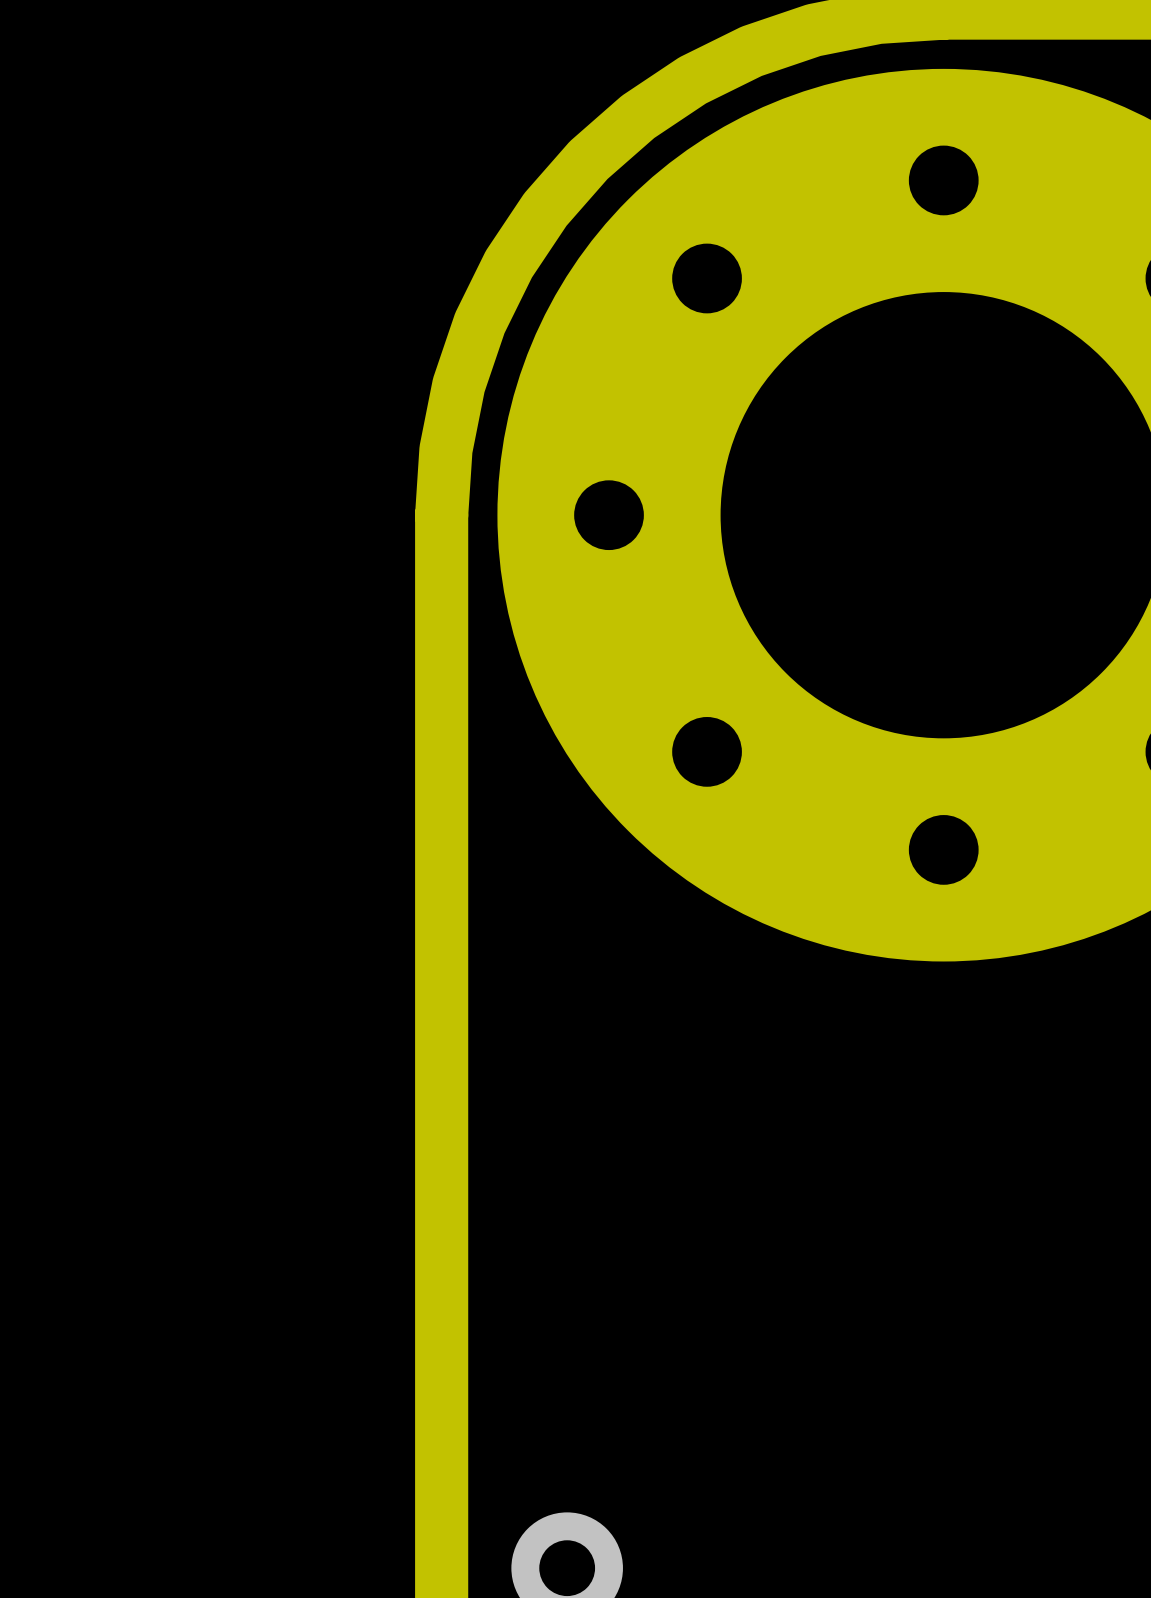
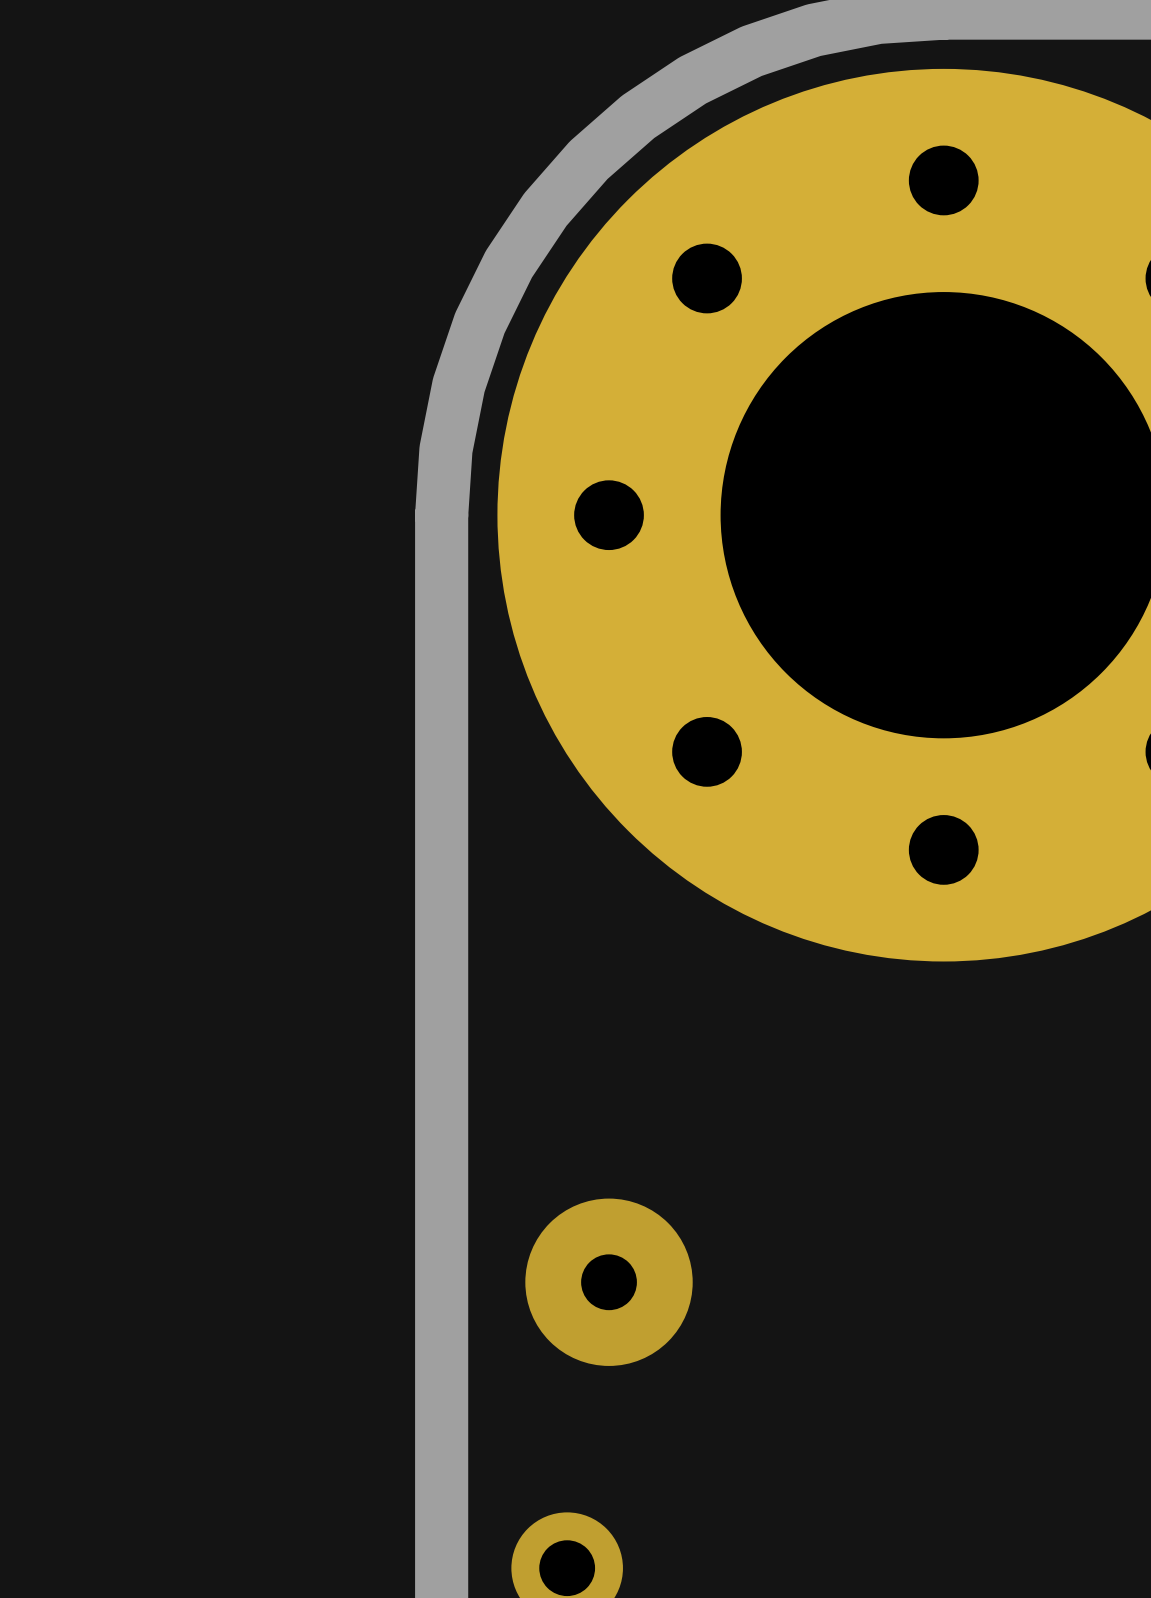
via: none -> (609, 1282)

